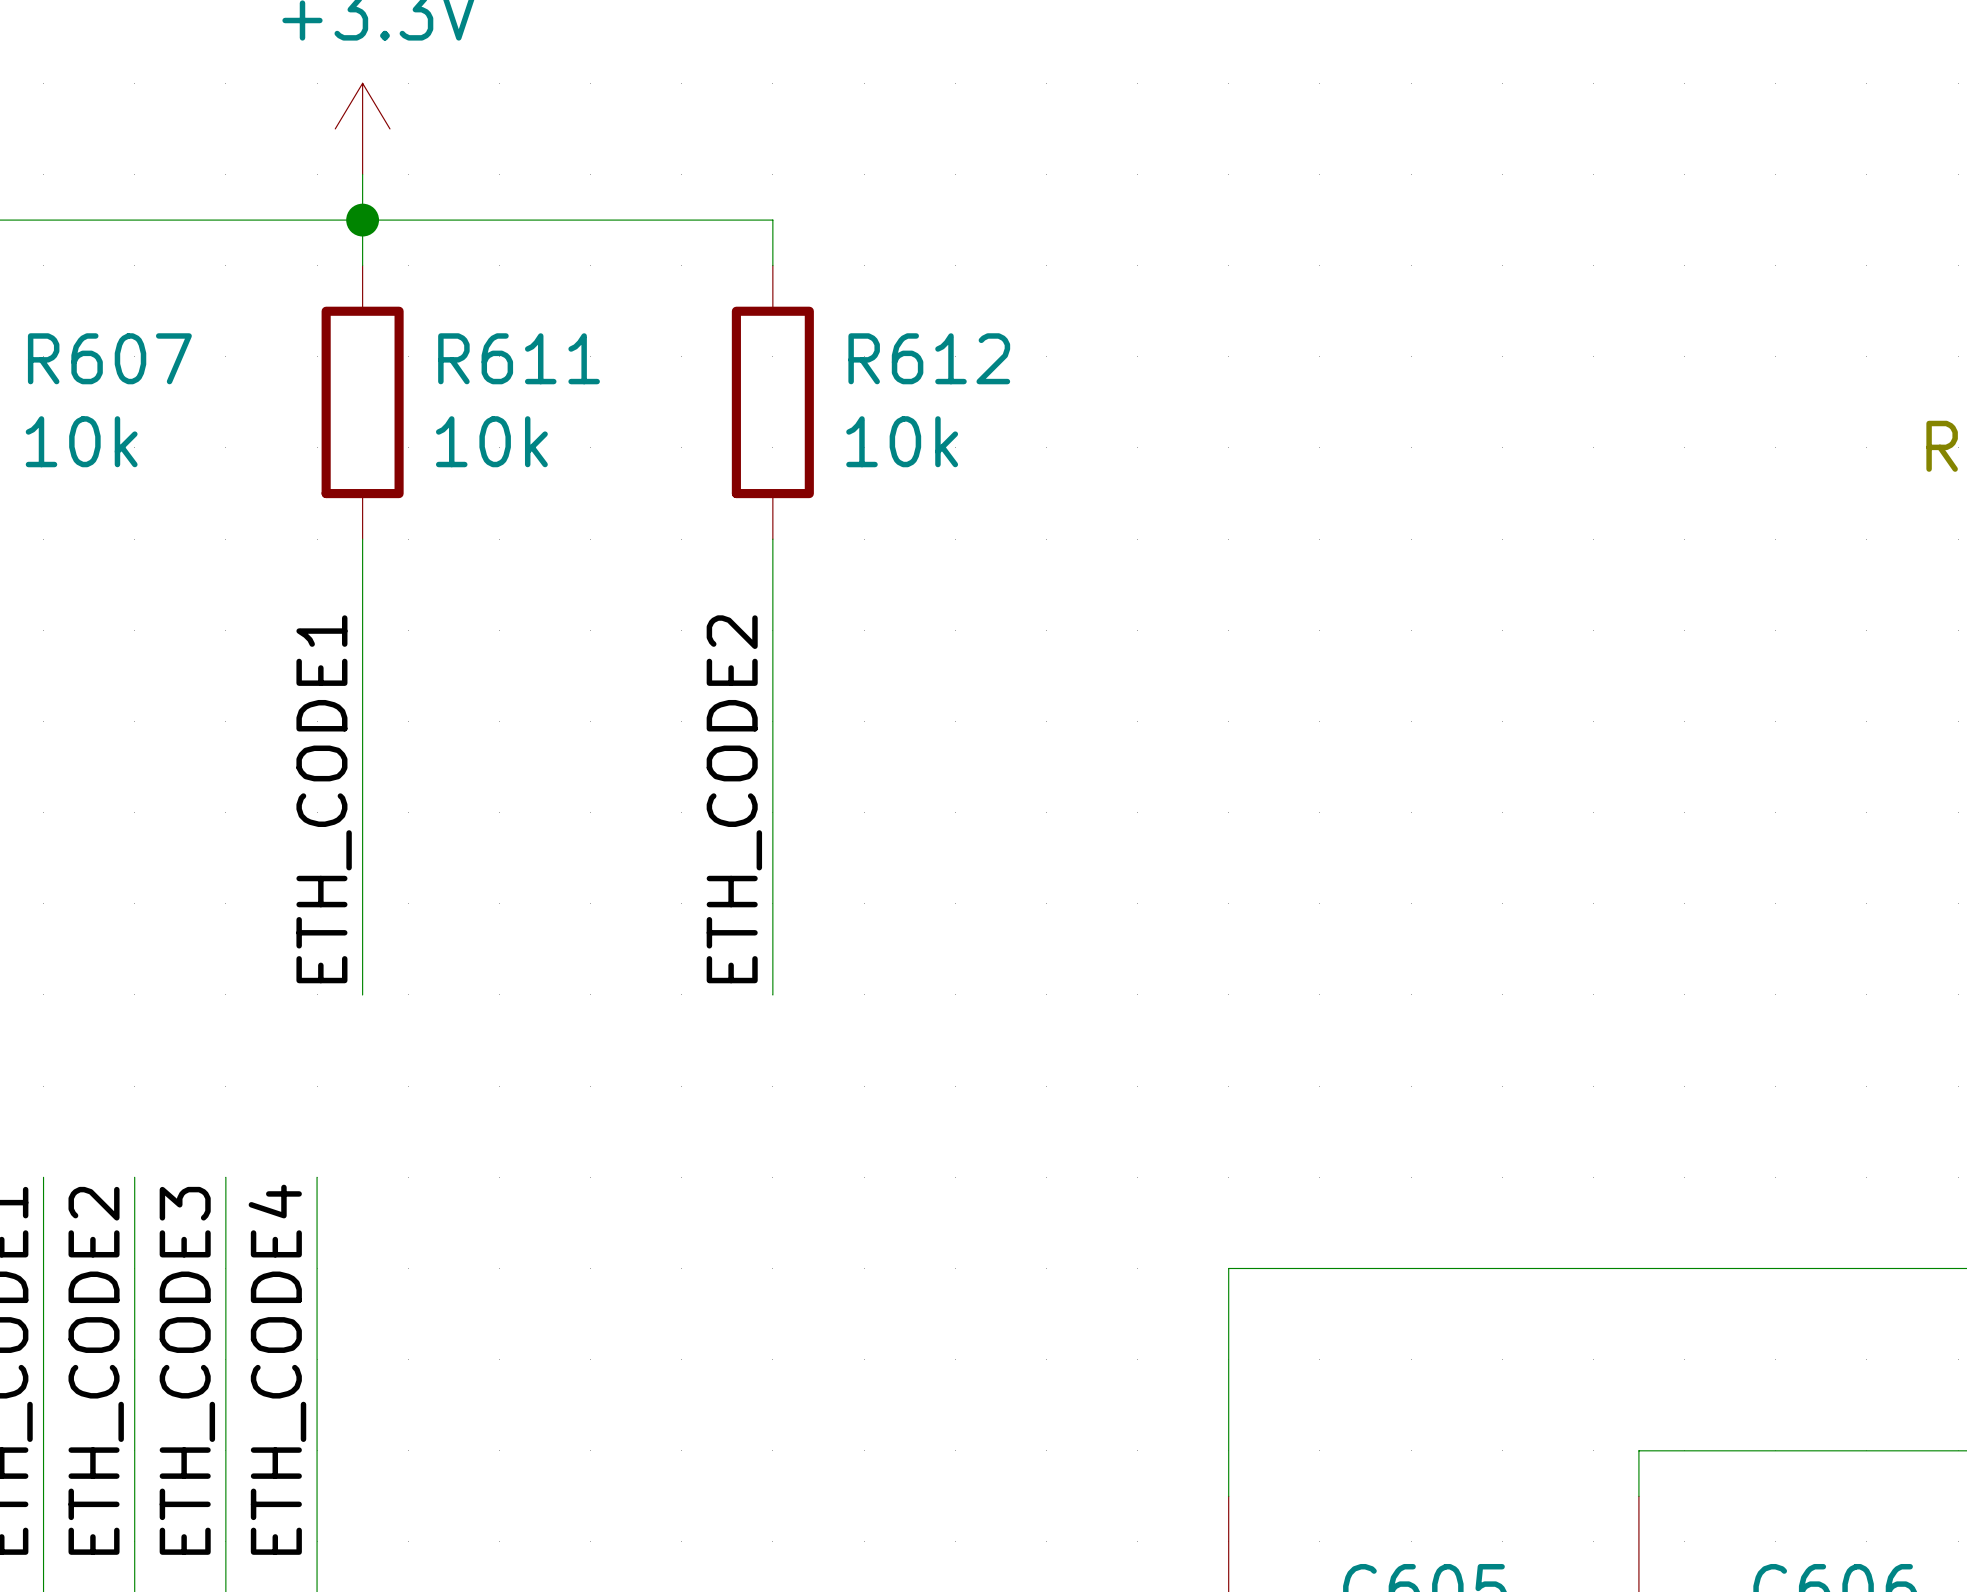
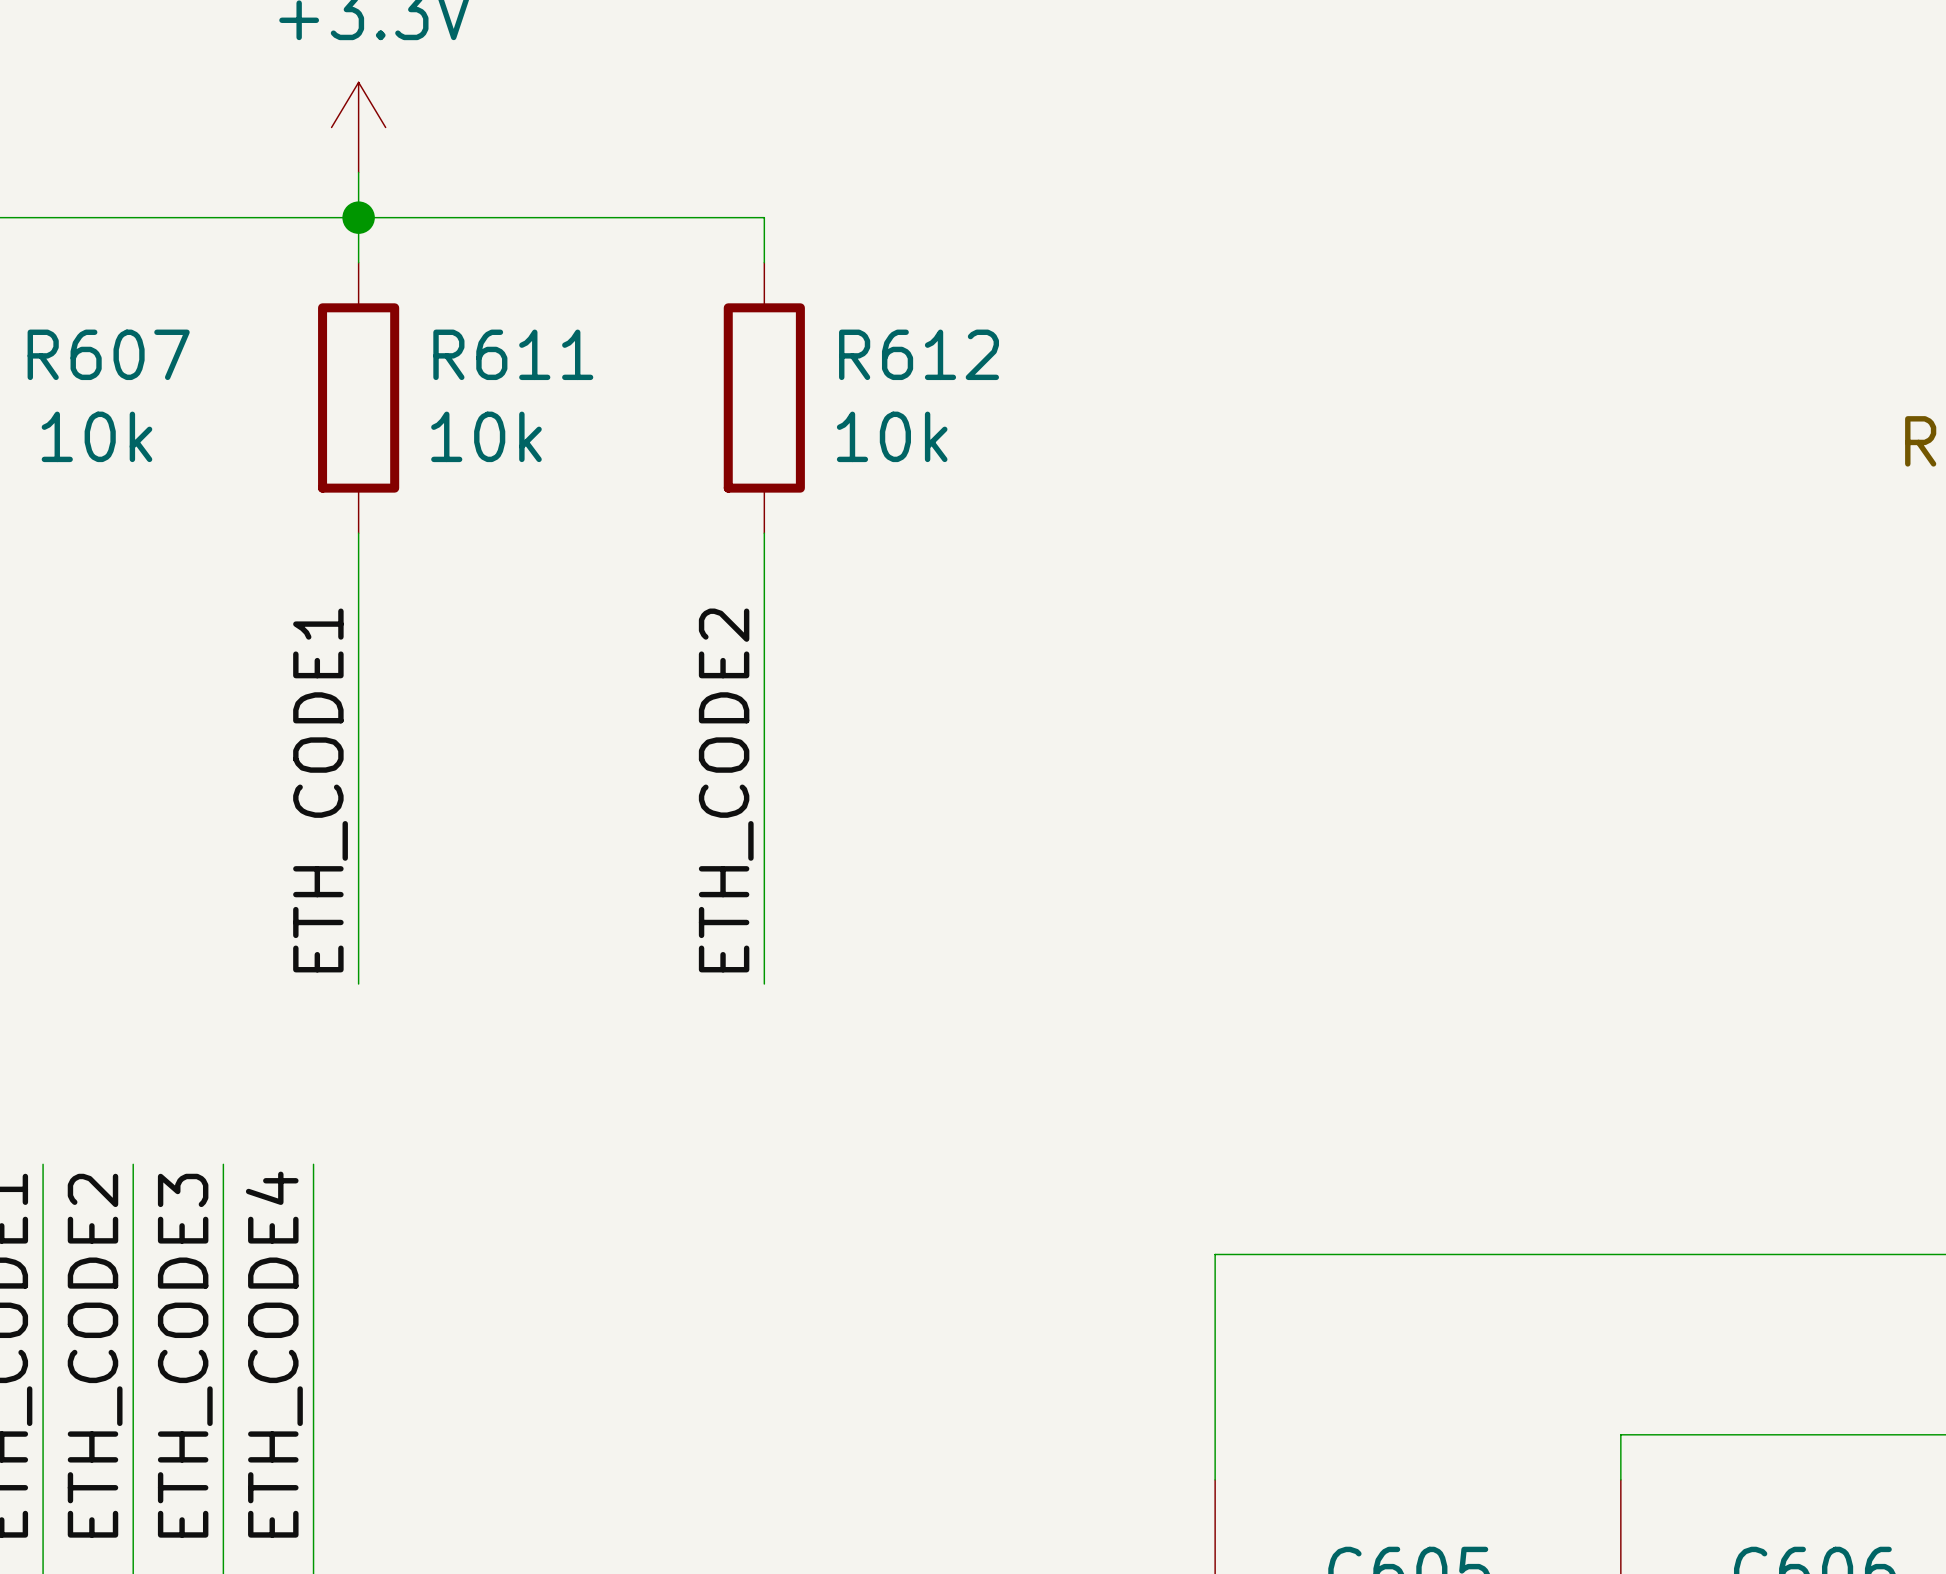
R607 value position: 10k (81, 441) -> 10k (96, 436)

